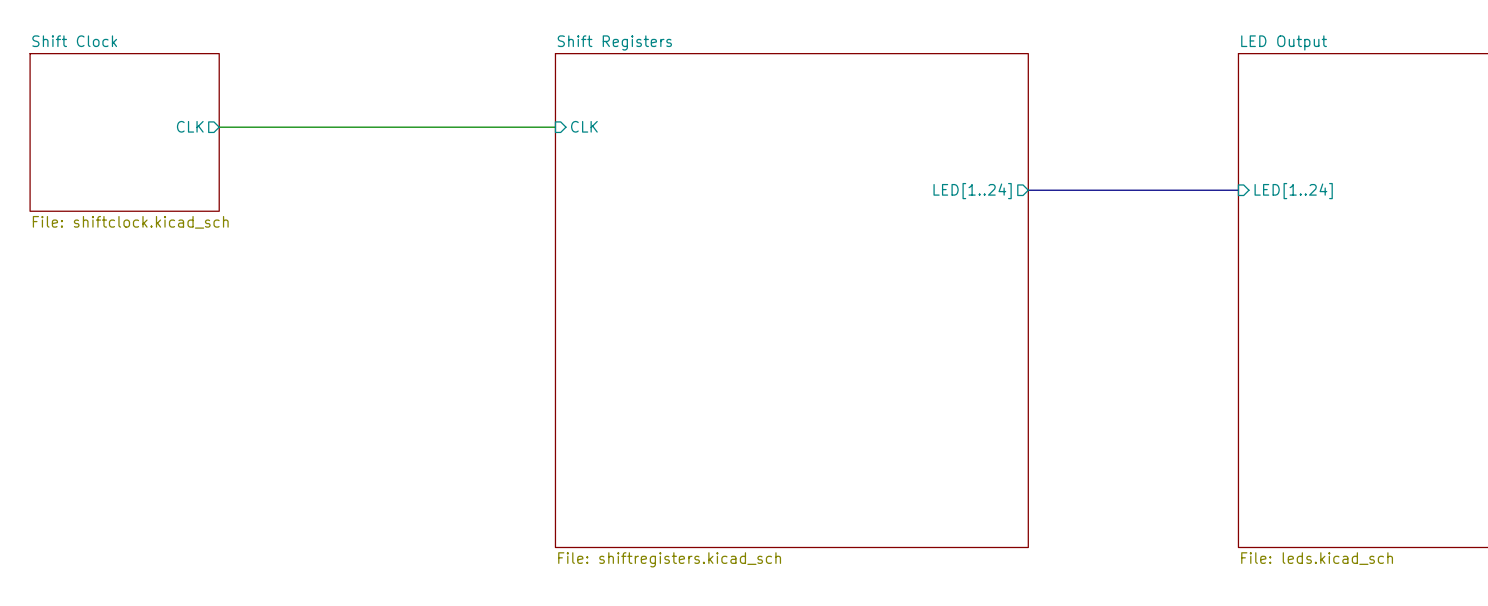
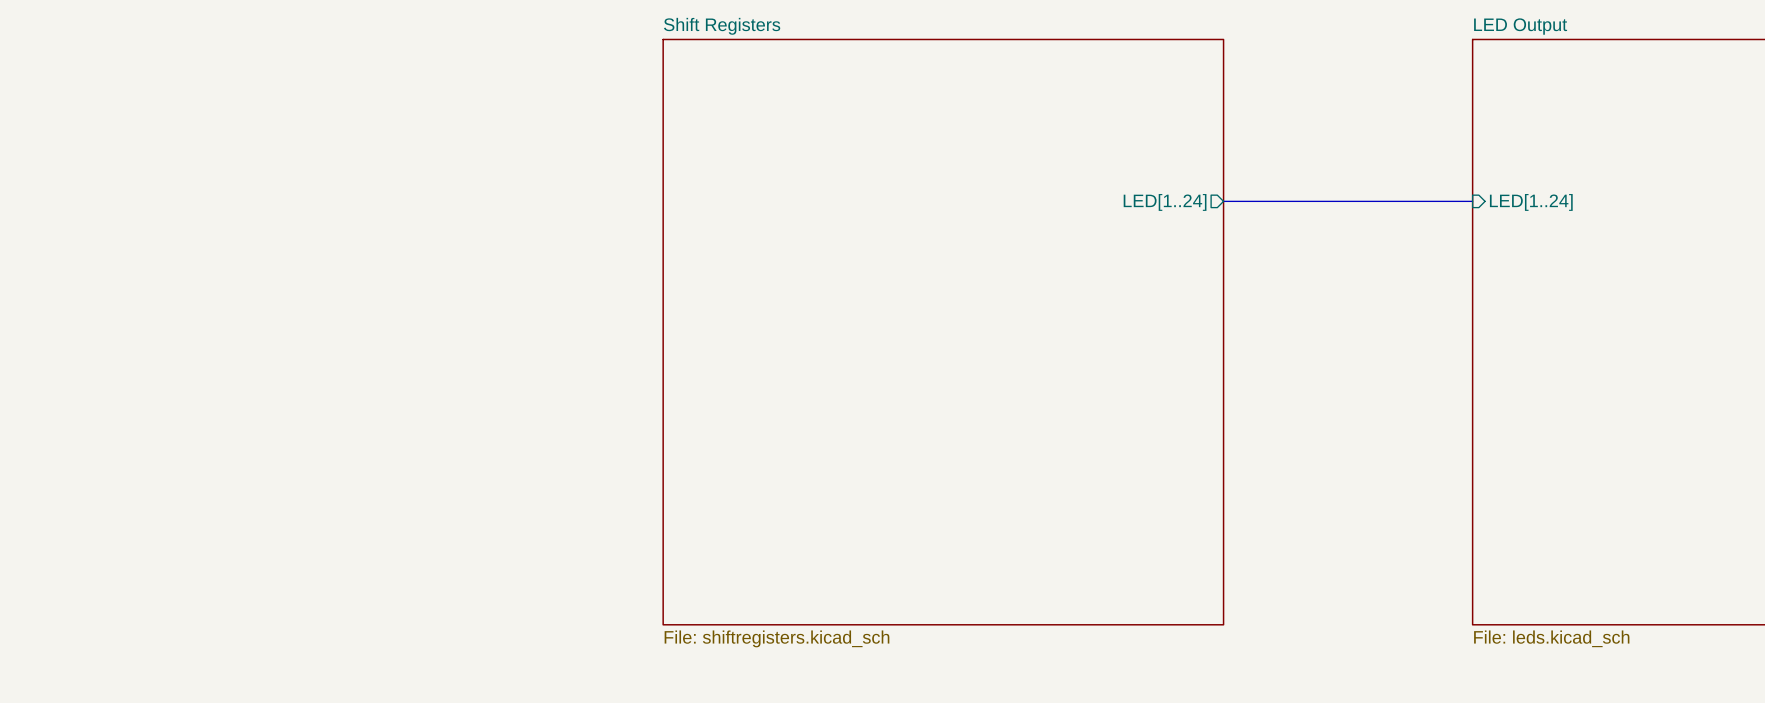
sheet pin: CLK (190, 126) -> none
sheet pin: CLK (584, 126) -> none
wire: (219, 127) (555, 127) -> none
sheet Shift Clock: File: shiftclock.kicad_sch (124, 132) -> none

